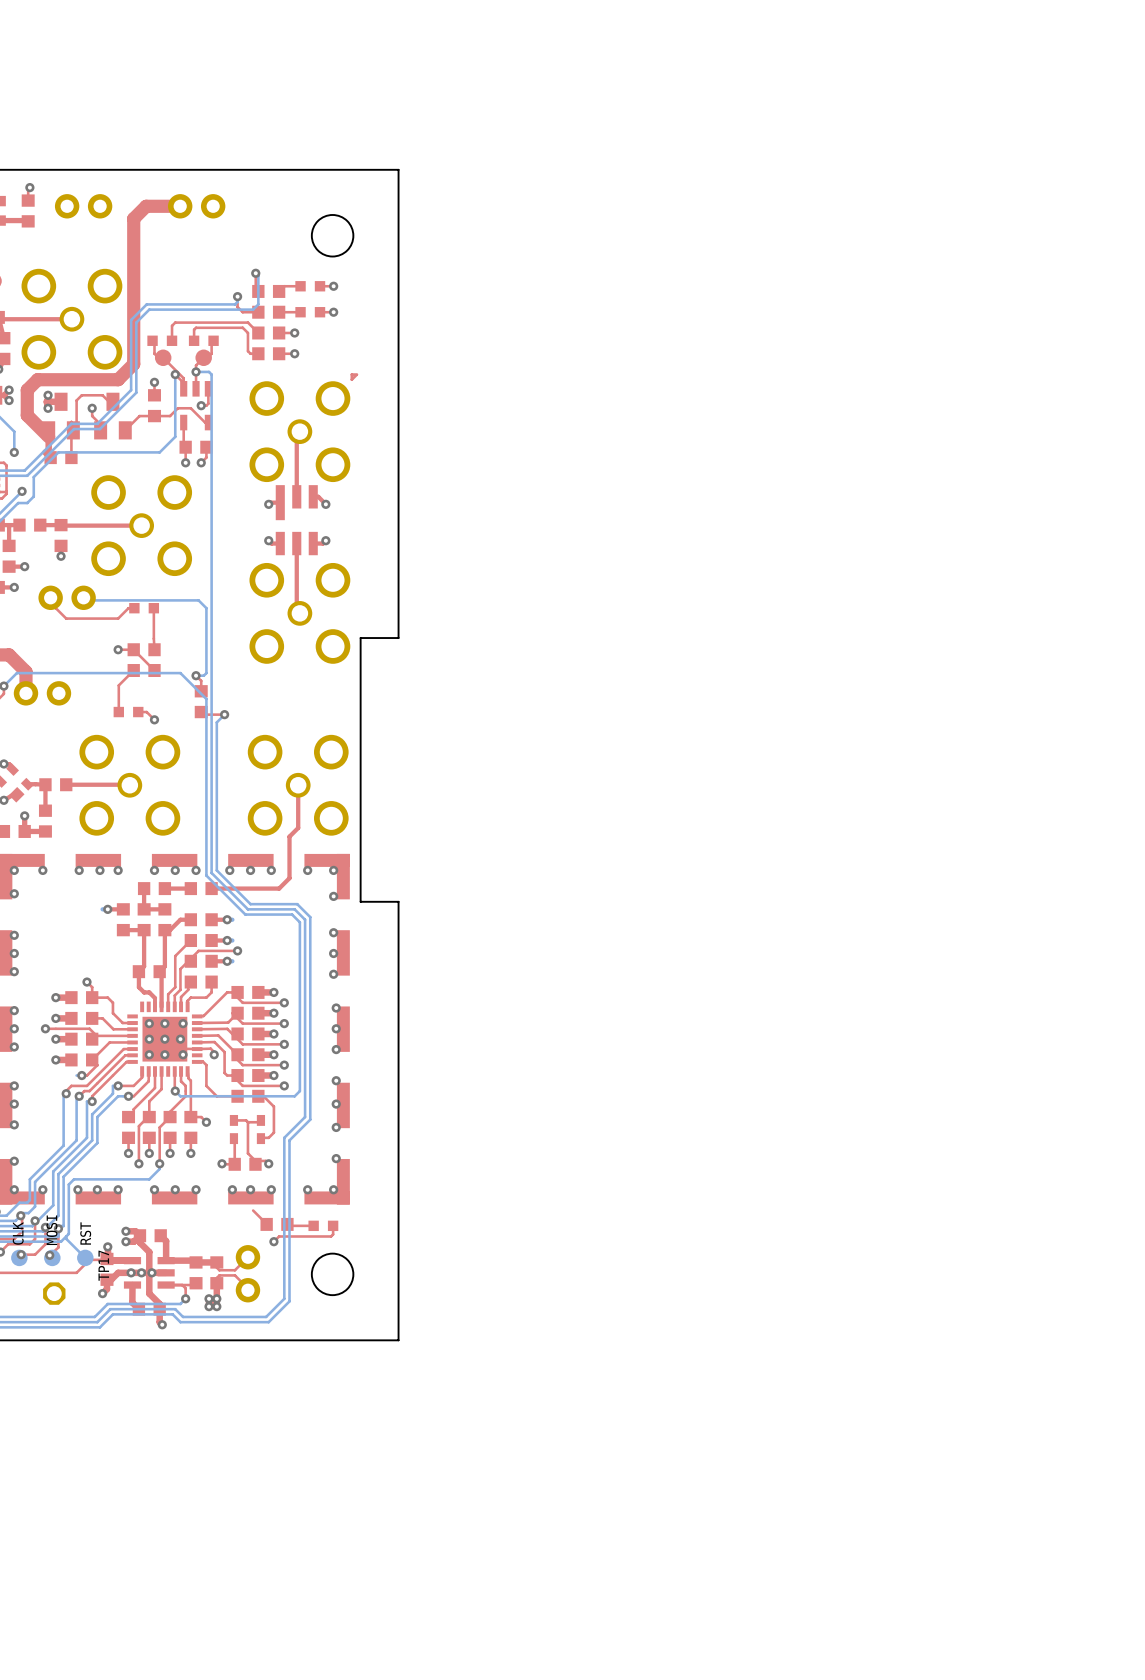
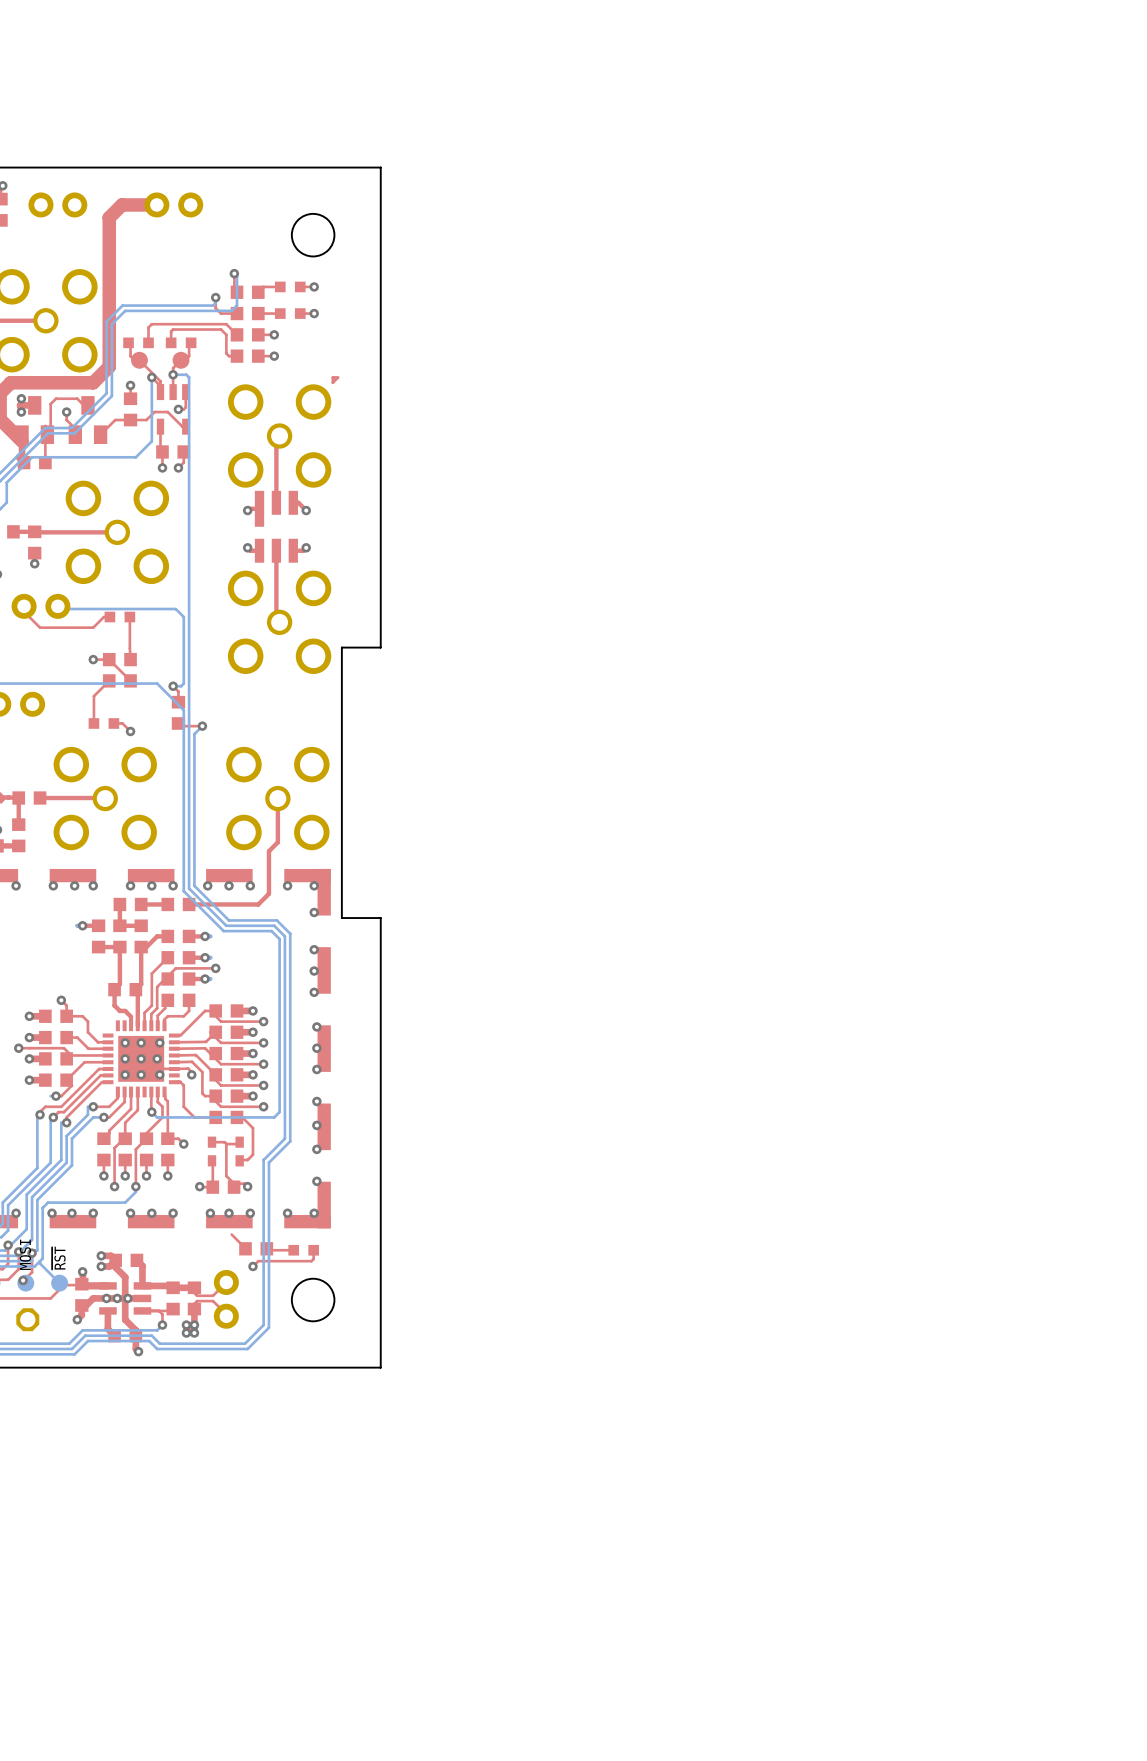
text: RST (85, 1233) -> ~{RST} (58, 1258)
TP17 name: TP17 (103, 1265) -> none

